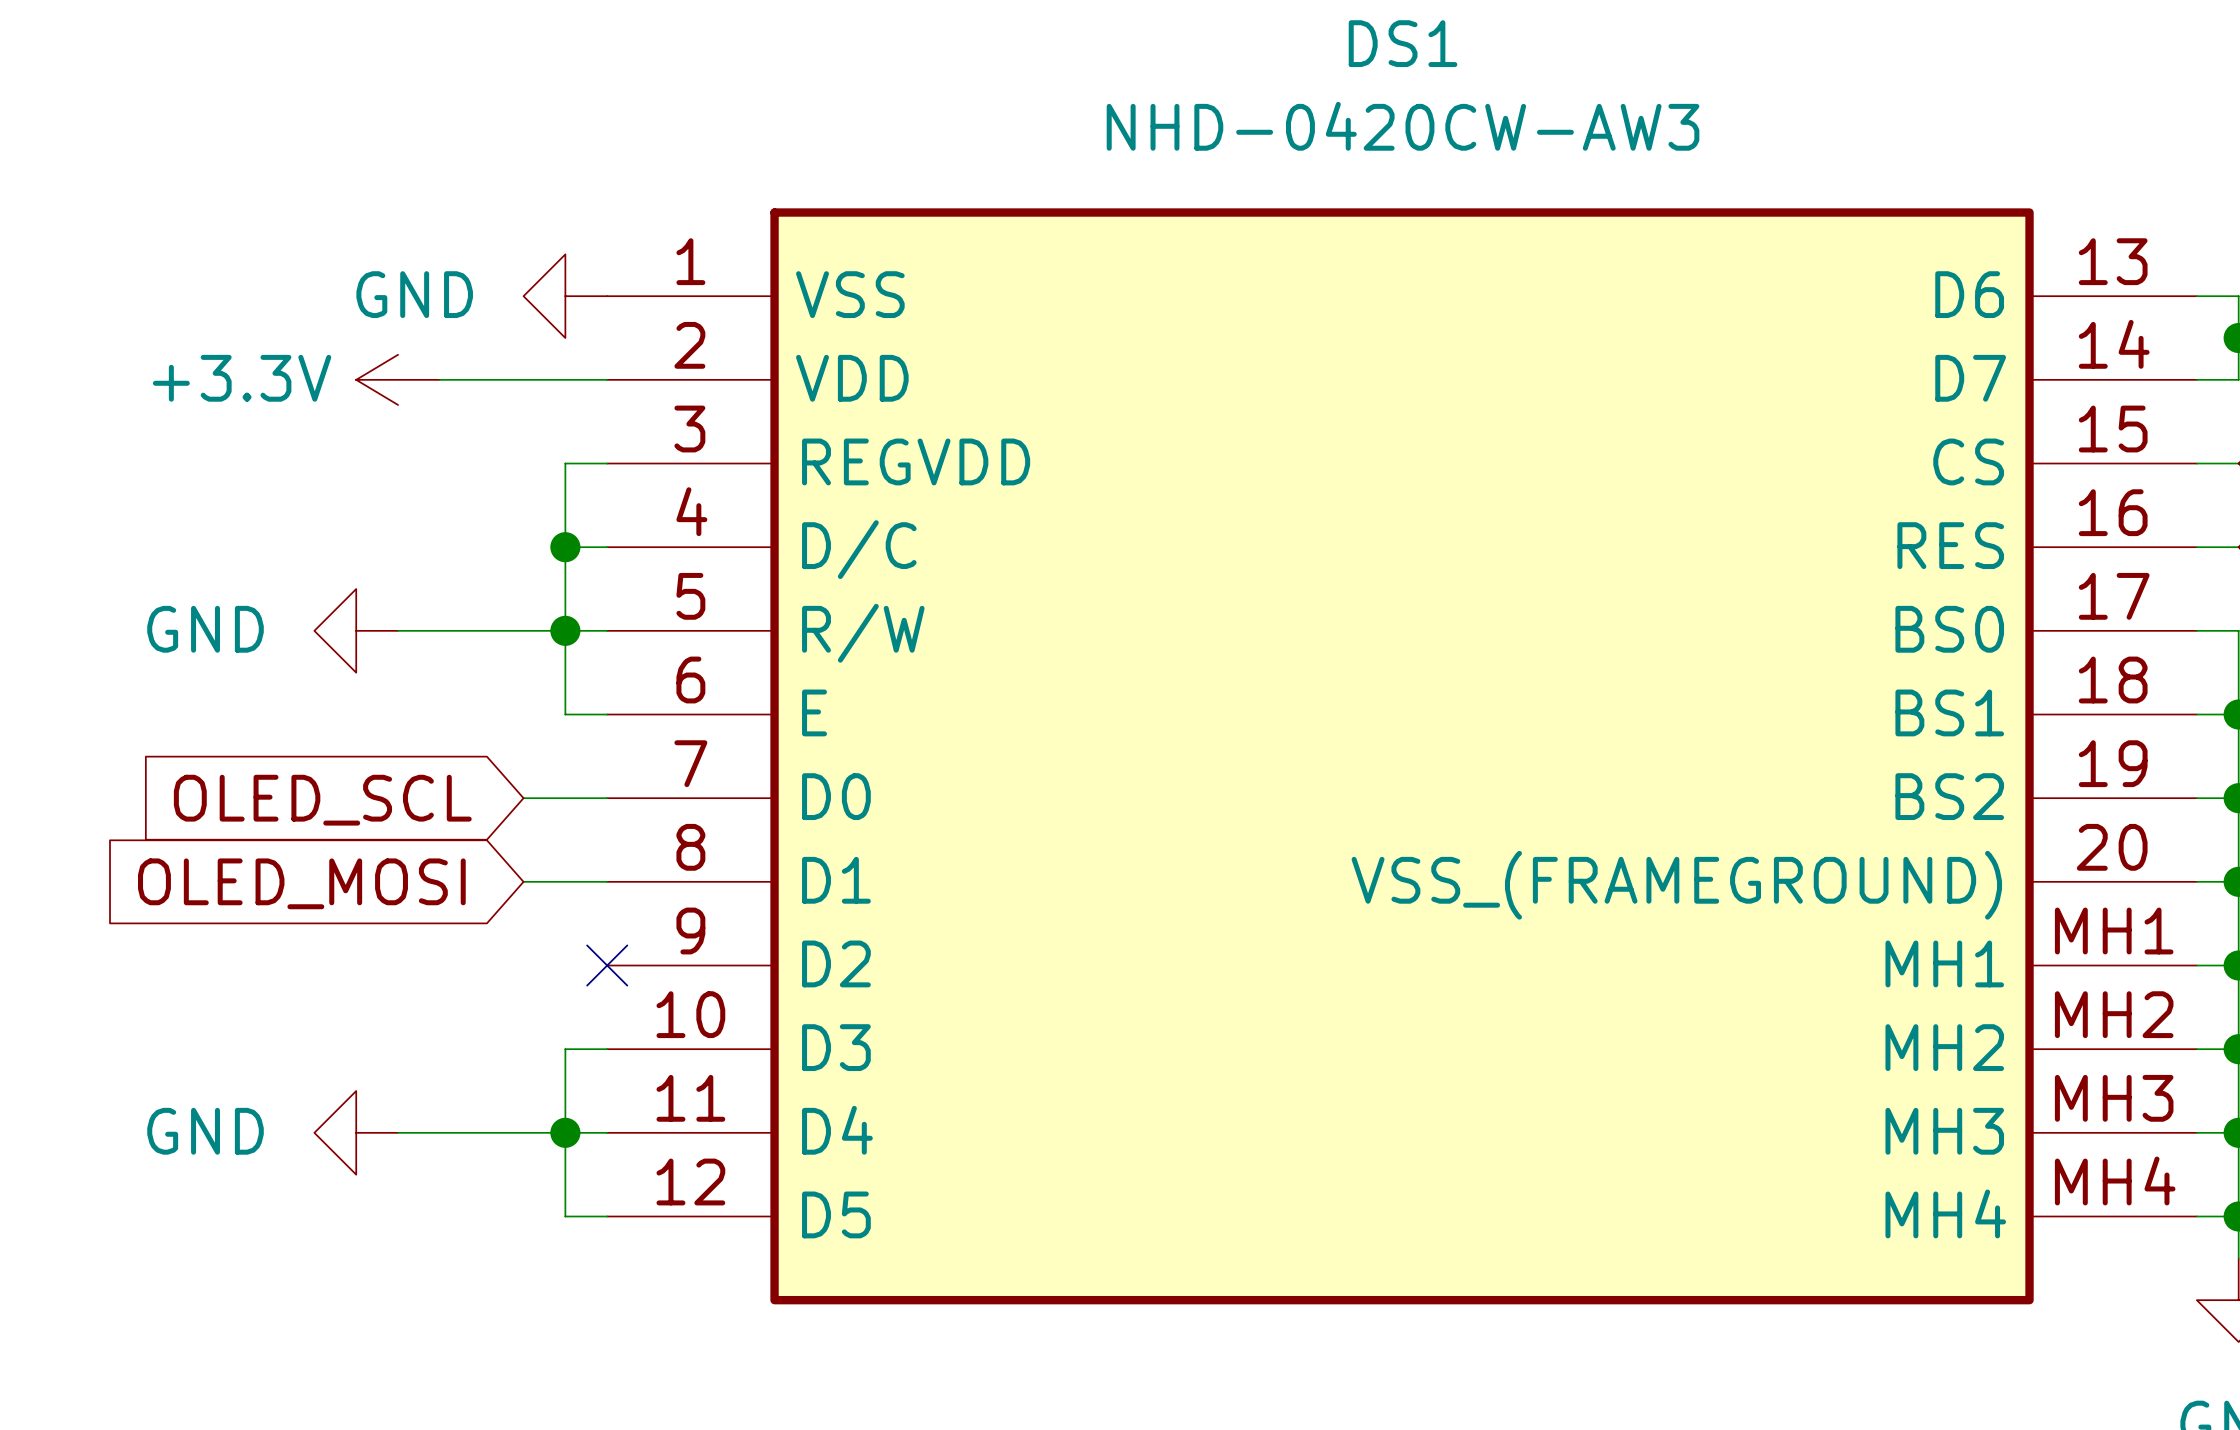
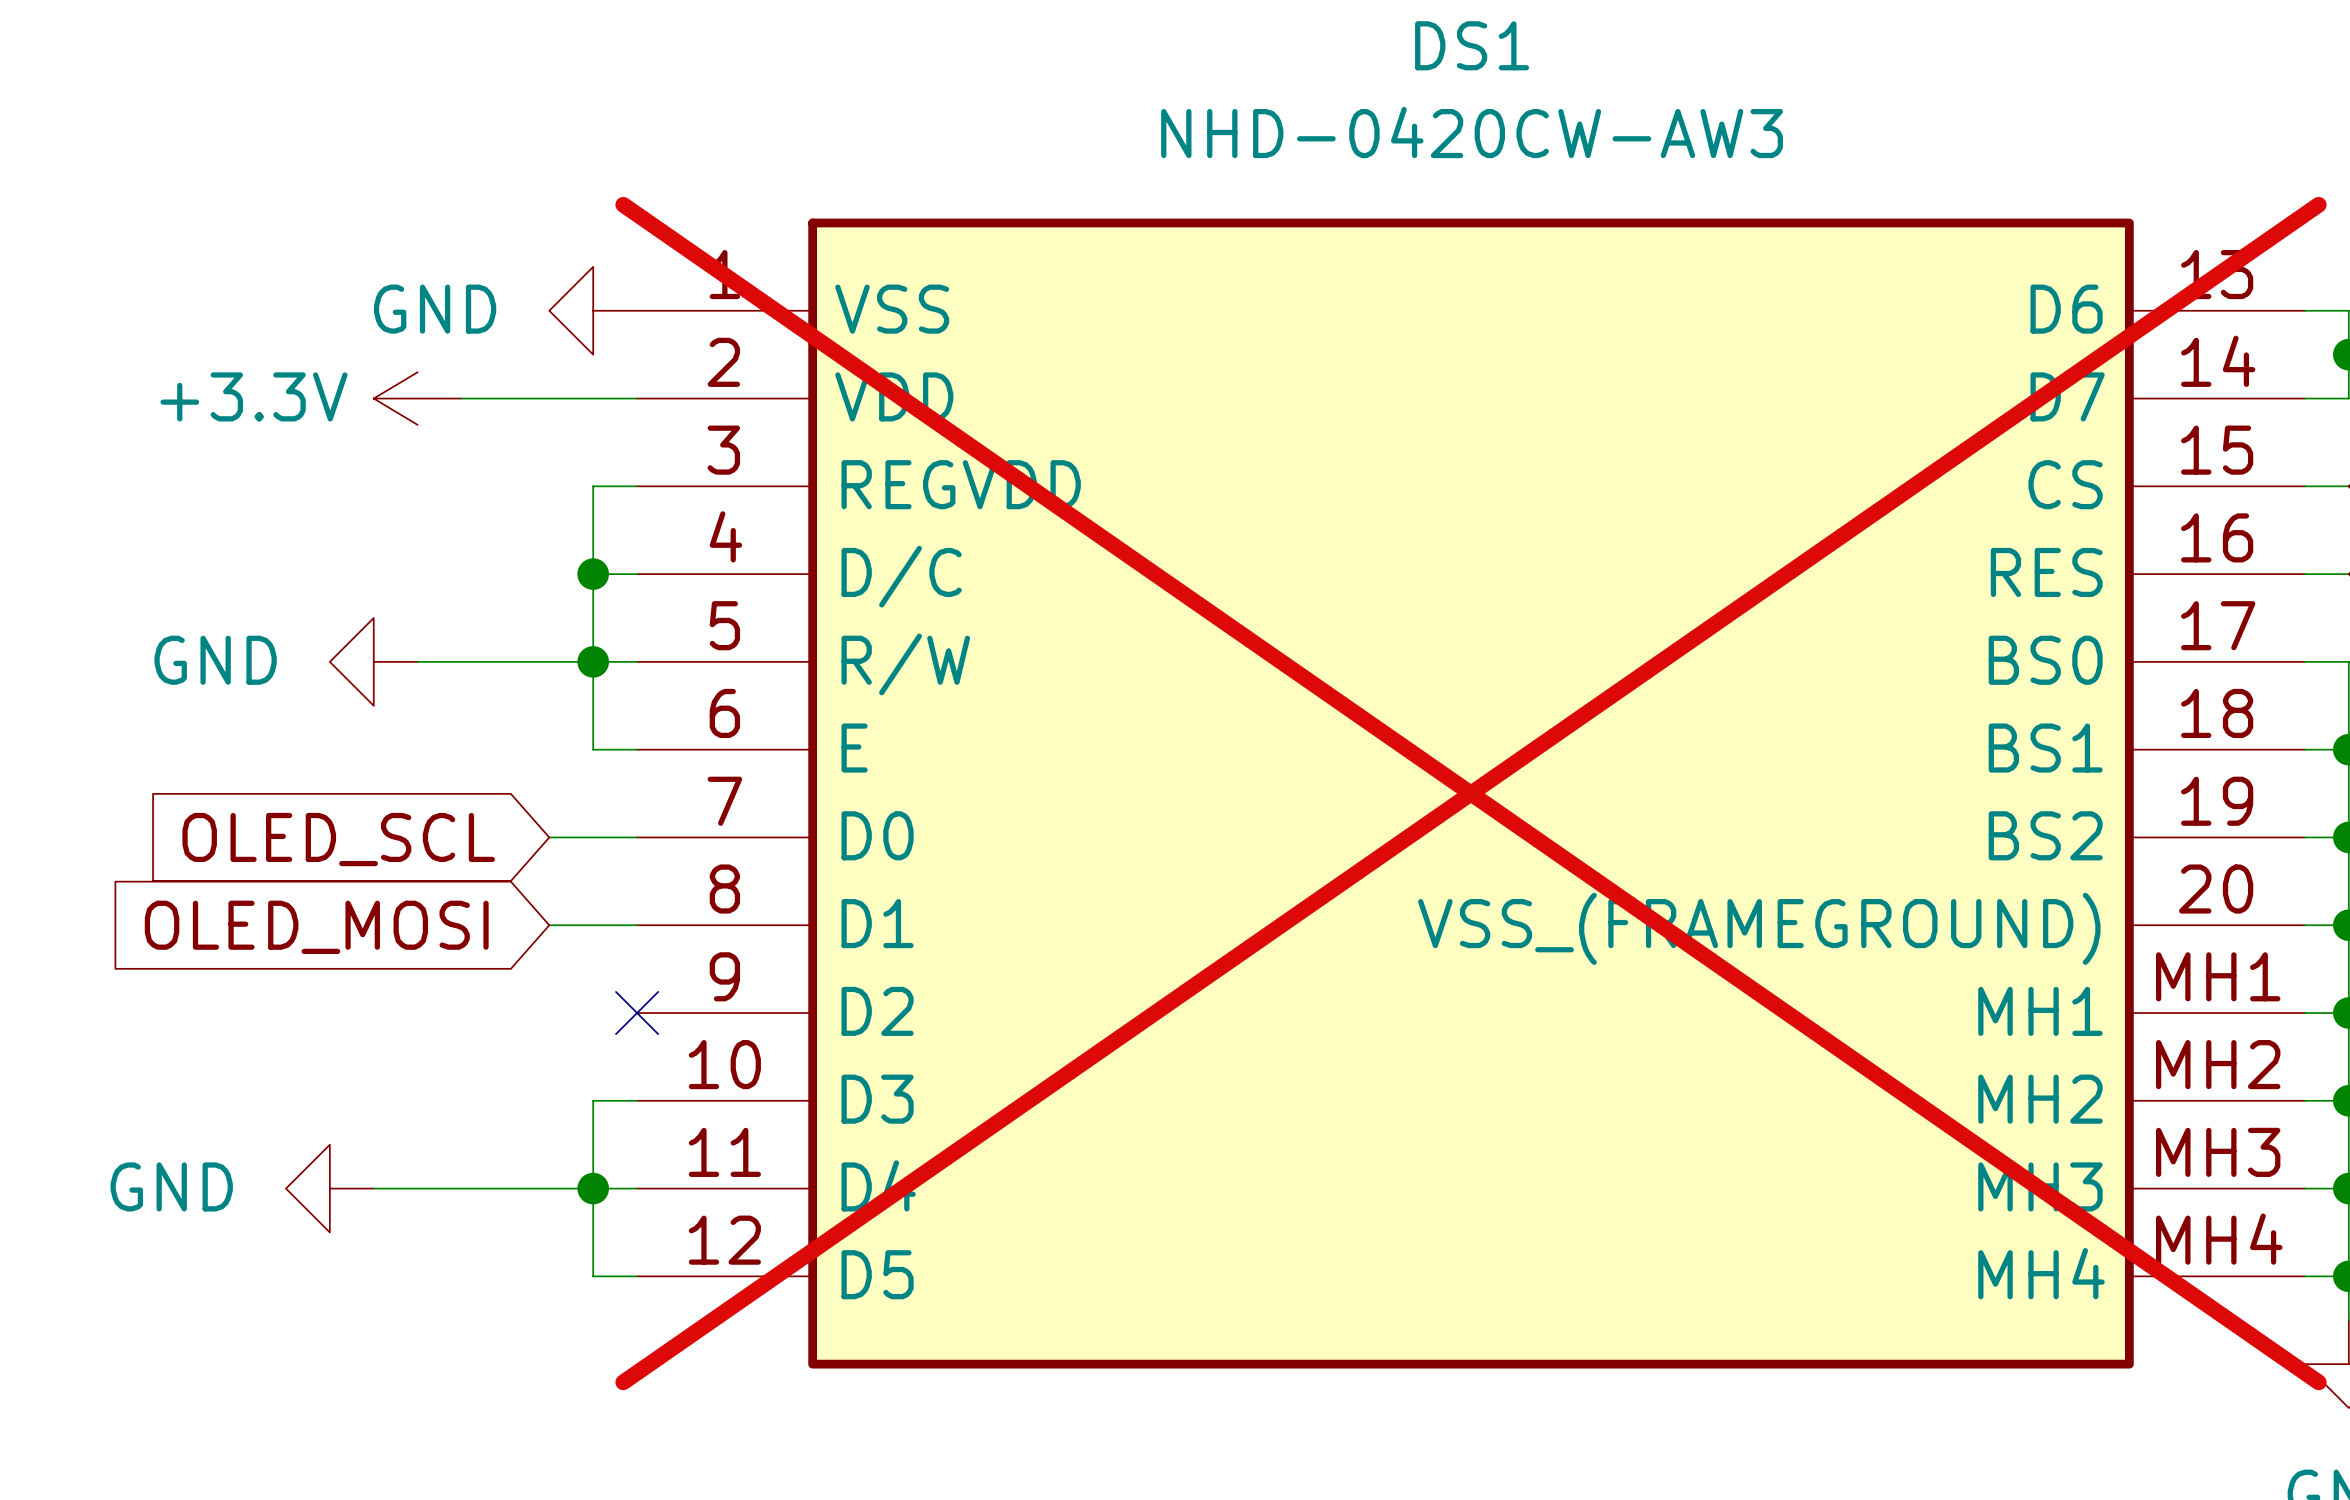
DS1 do-not-place cross: none -> (1471, 793)
power symbol position: GND (356, 1132) -> GND (329, 1188)

